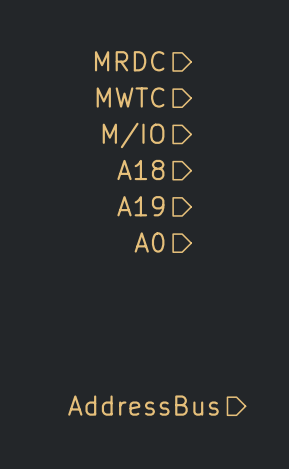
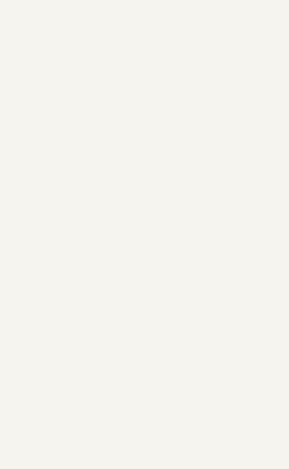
hierarchical label: MRDC (129, 61) -> none
hierarchical label: MWTC (130, 97) -> none
hierarchical label: M/IO (133, 135) -> none
hierarchical label: A18 (140, 169) -> none
hierarchical label: A19 (140, 206) -> none
hierarchical label: A0 (149, 242) -> none
hierarchical label: AddressBus (143, 405) -> none

